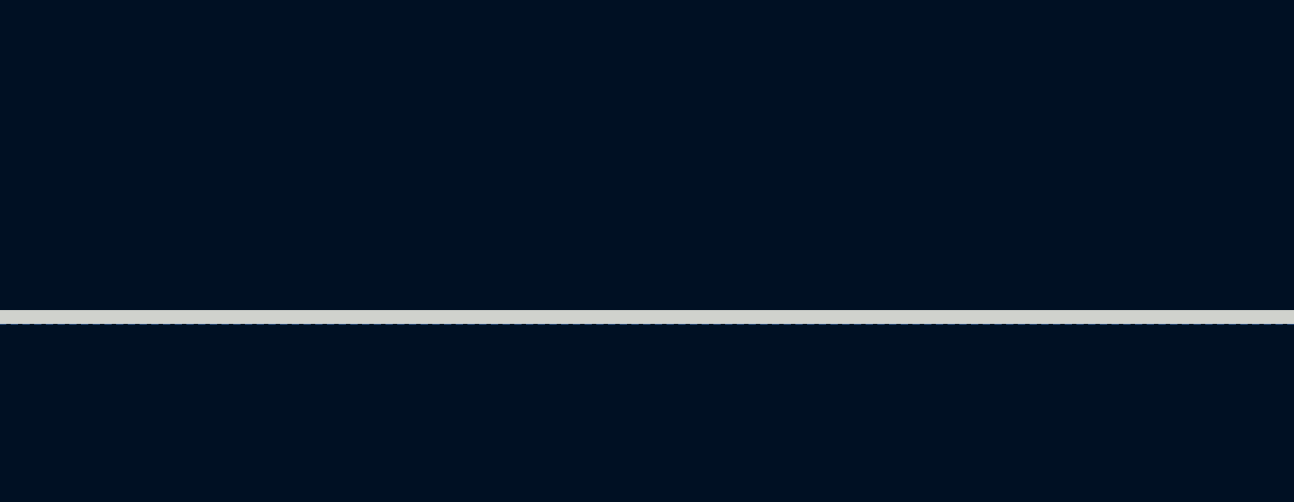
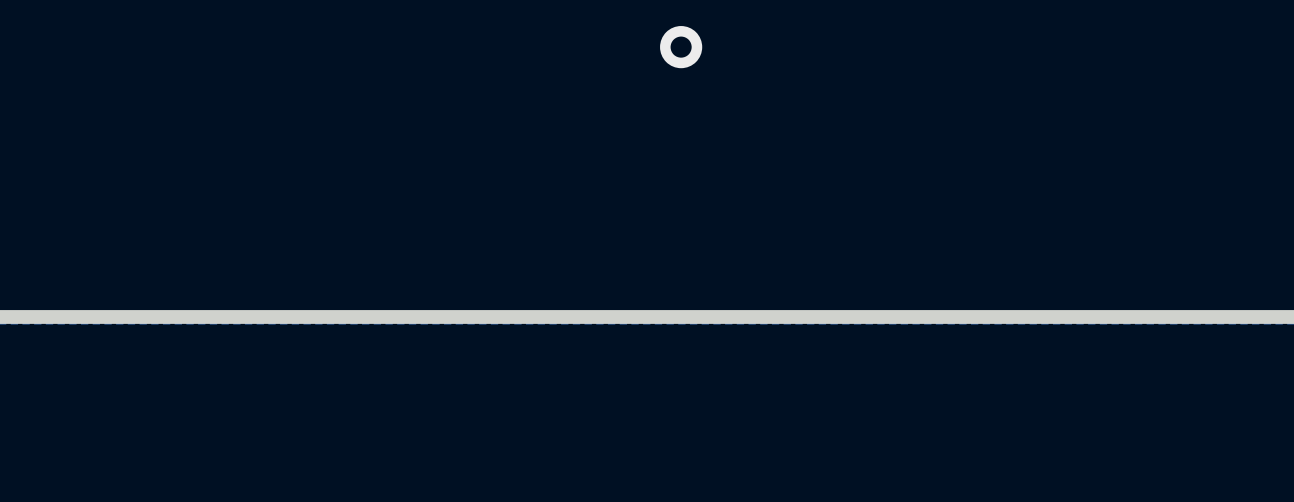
via: none -> (681, 47)

